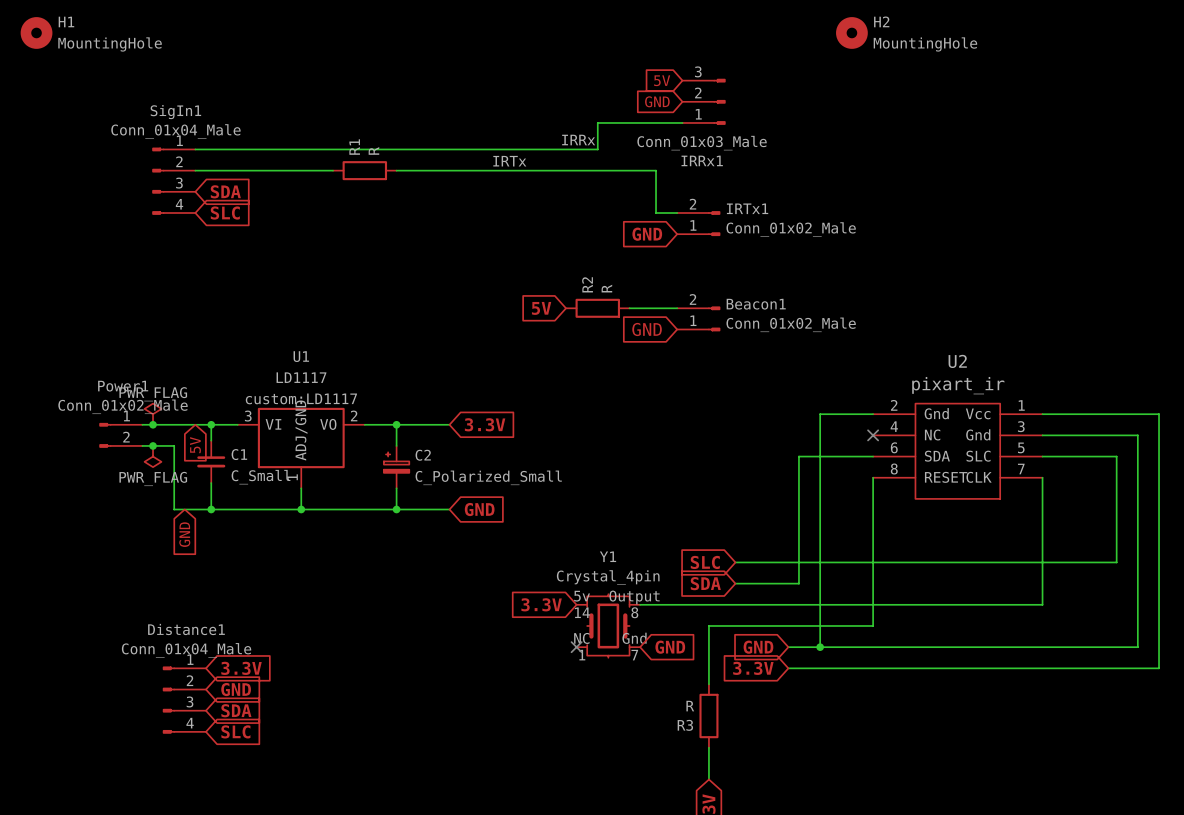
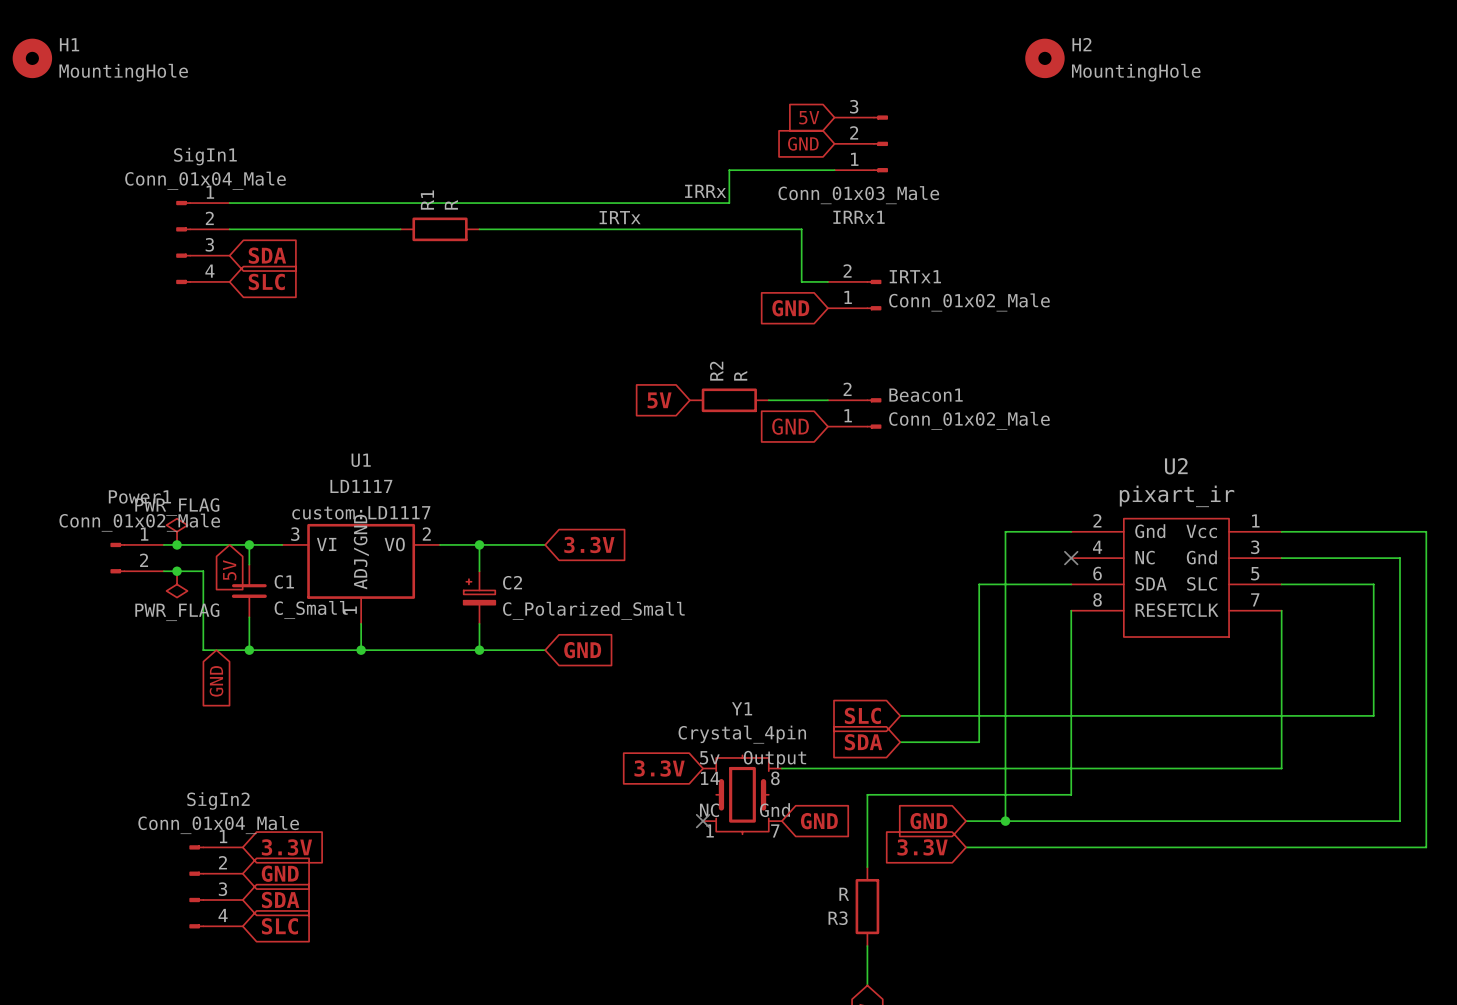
Distance1 name: Distance1 (186, 629) -> SigIn2 (218, 800)

